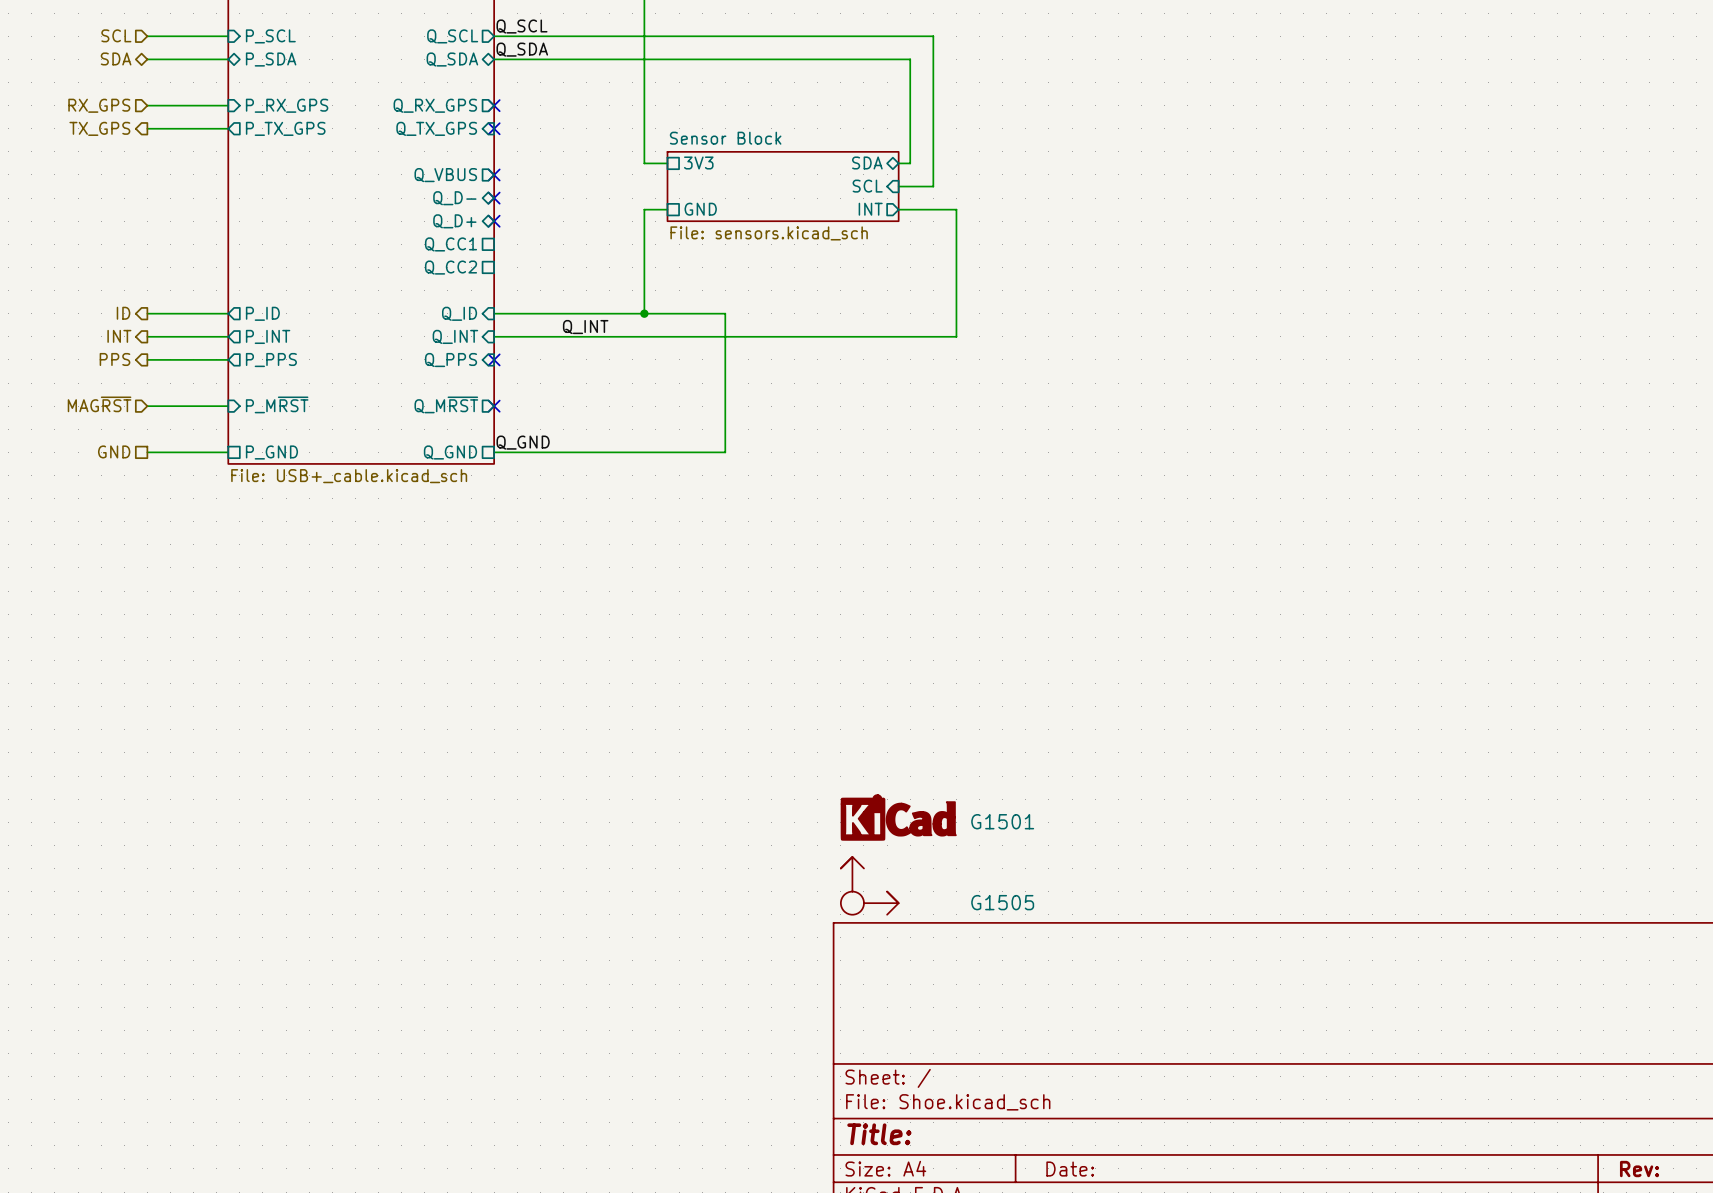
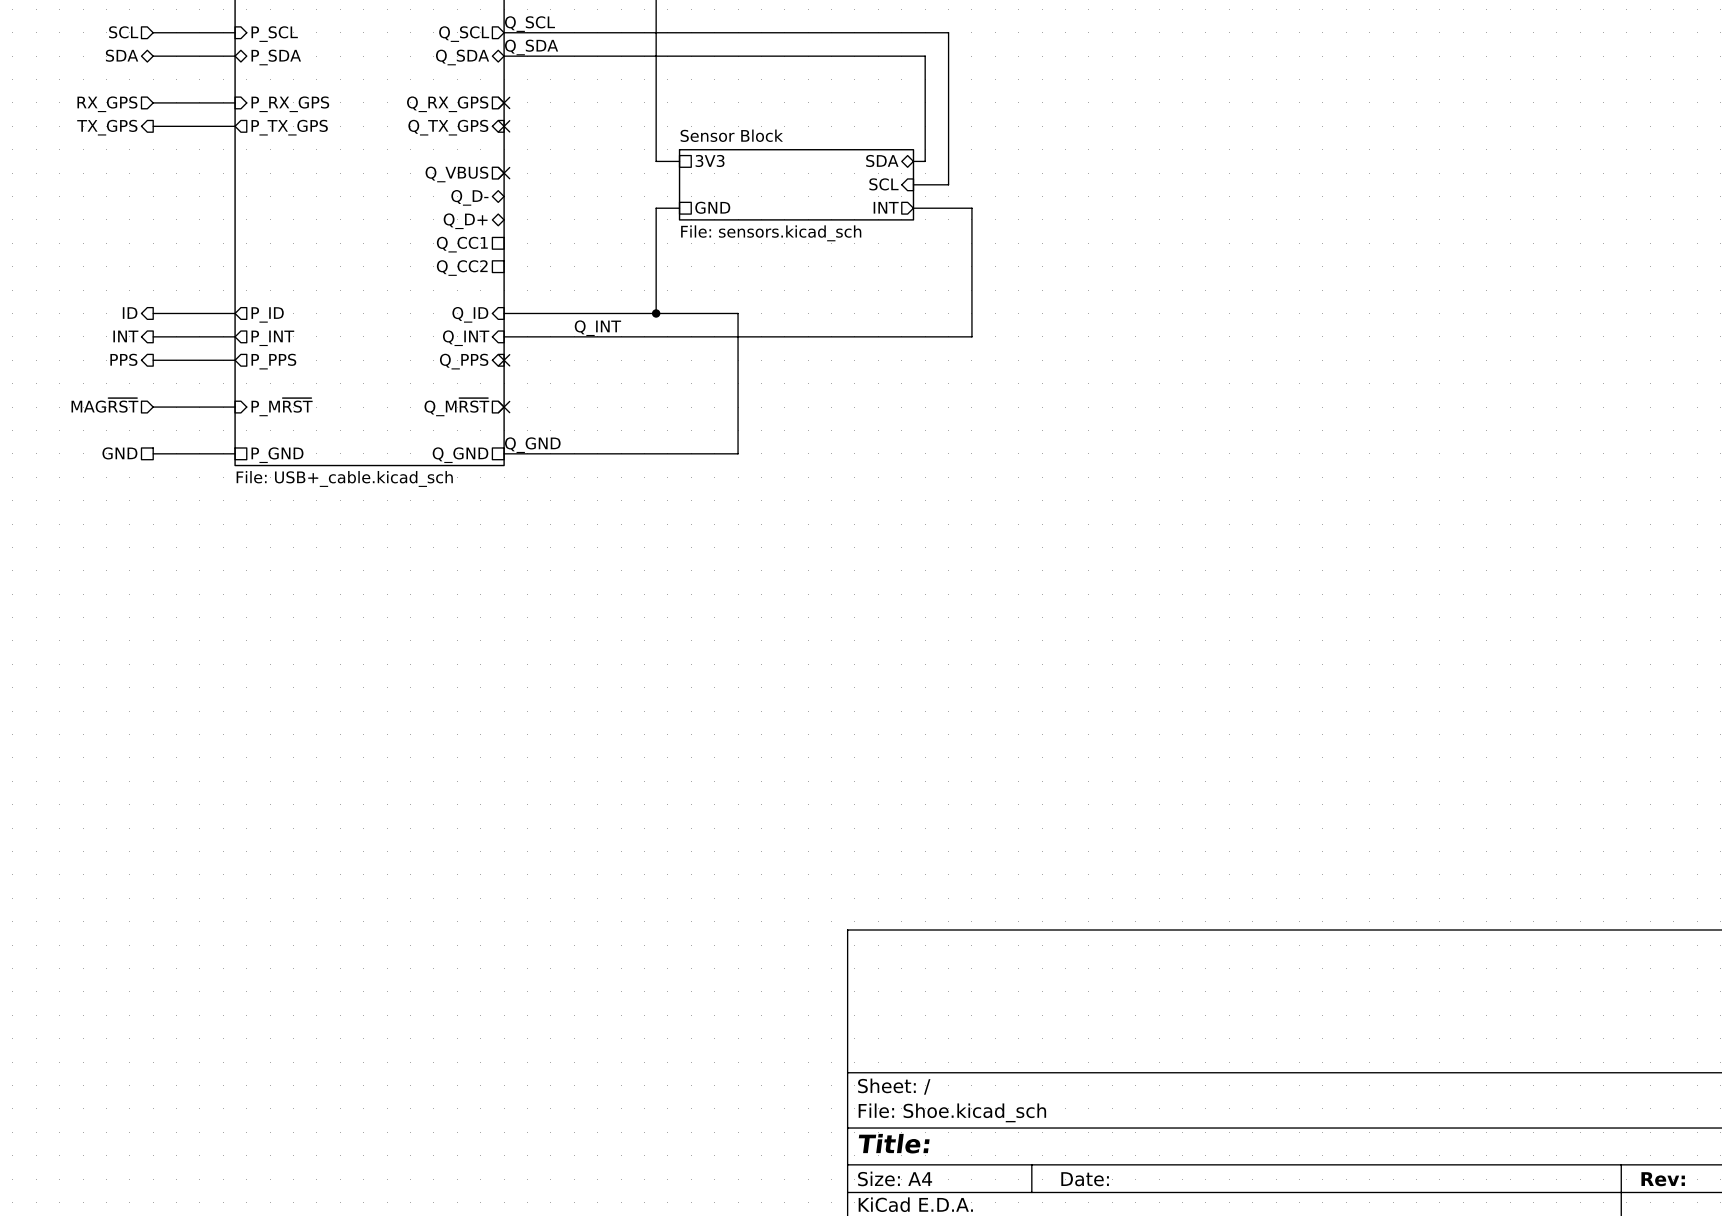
no-connect mark: (494, 198) -> none
no-connect mark: (494, 221) -> none
G1501: (898, 817) -> none
G1505: (869, 885) -> none

